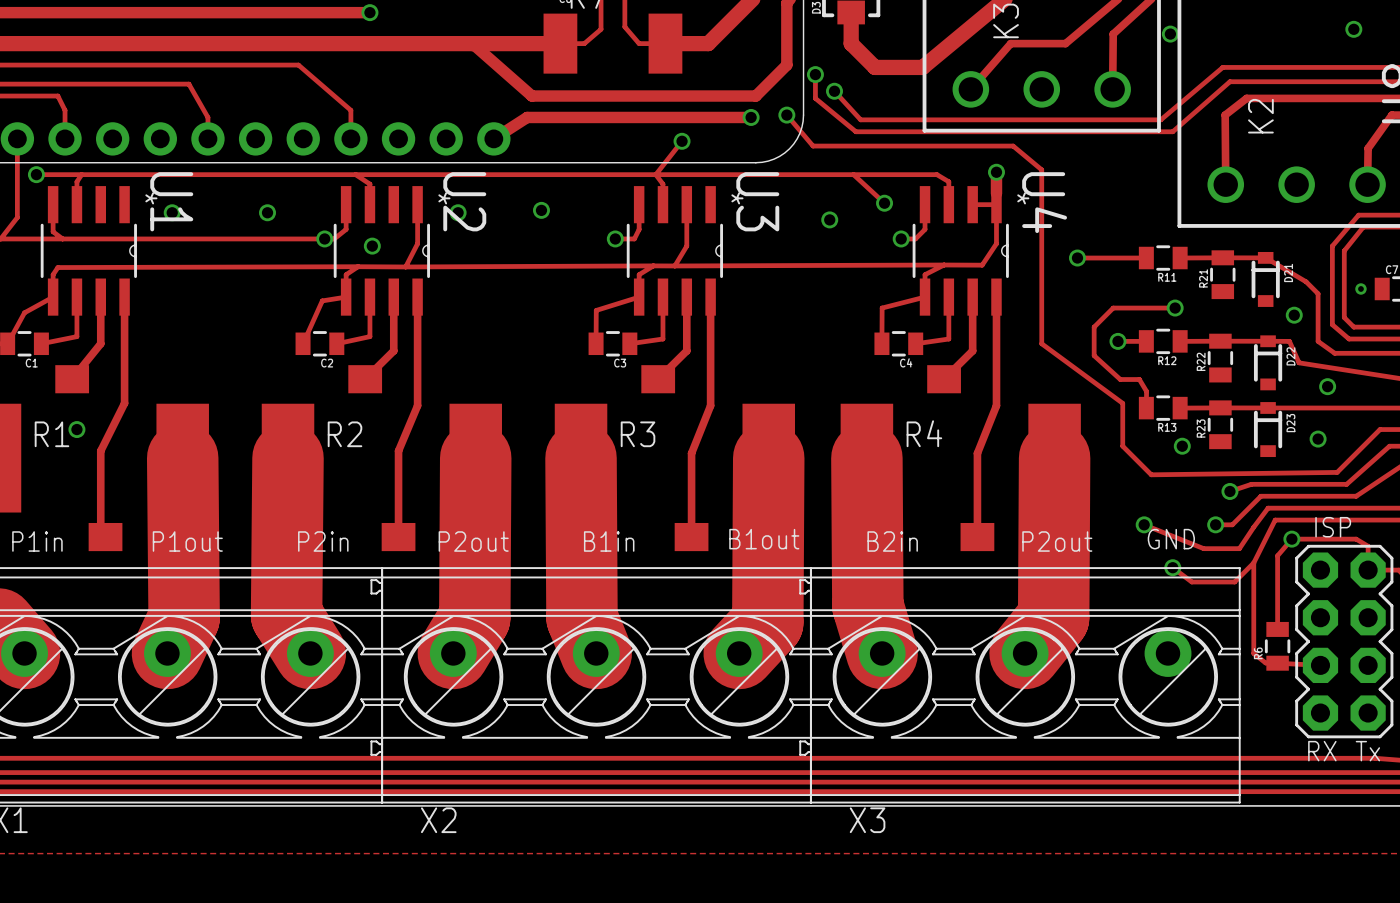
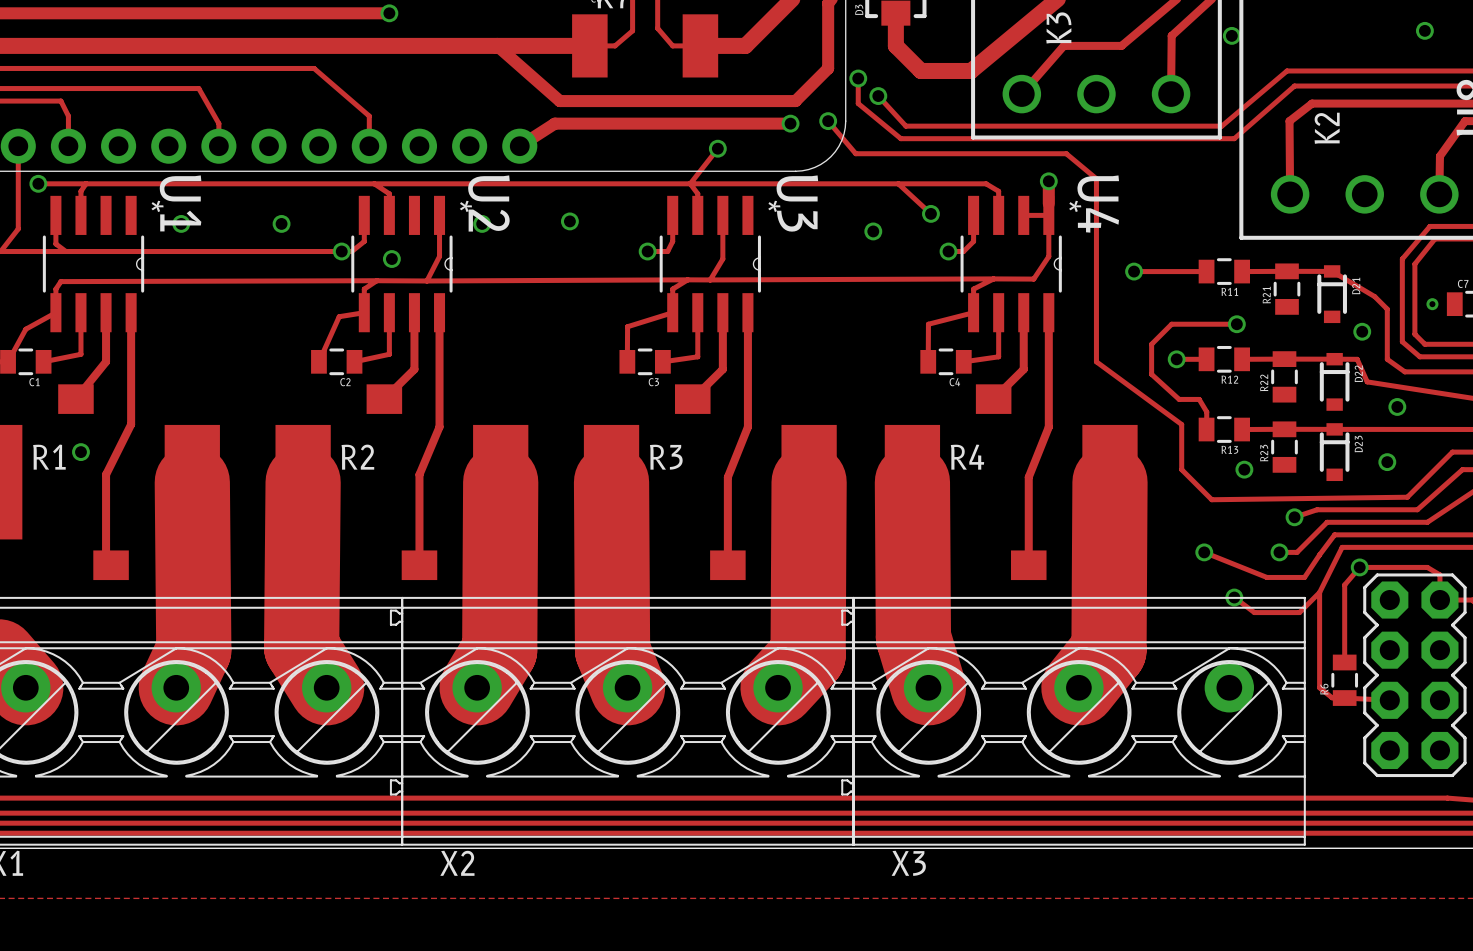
text: ISP (1333, 527) -> none
text: B1out (764, 539) -> none
text: GND (1171, 539) -> none
text: P1in (37, 541) -> none
text: P1out (187, 541) -> none
text: P2in (323, 541) -> none
text: P2out (473, 541) -> none
text: B1in (609, 541) -> none
text: B2in (892, 541) -> none
text: P2out (1057, 541) -> none
text: RX (1322, 751) -> none
text: Tx (1367, 751) -> none

